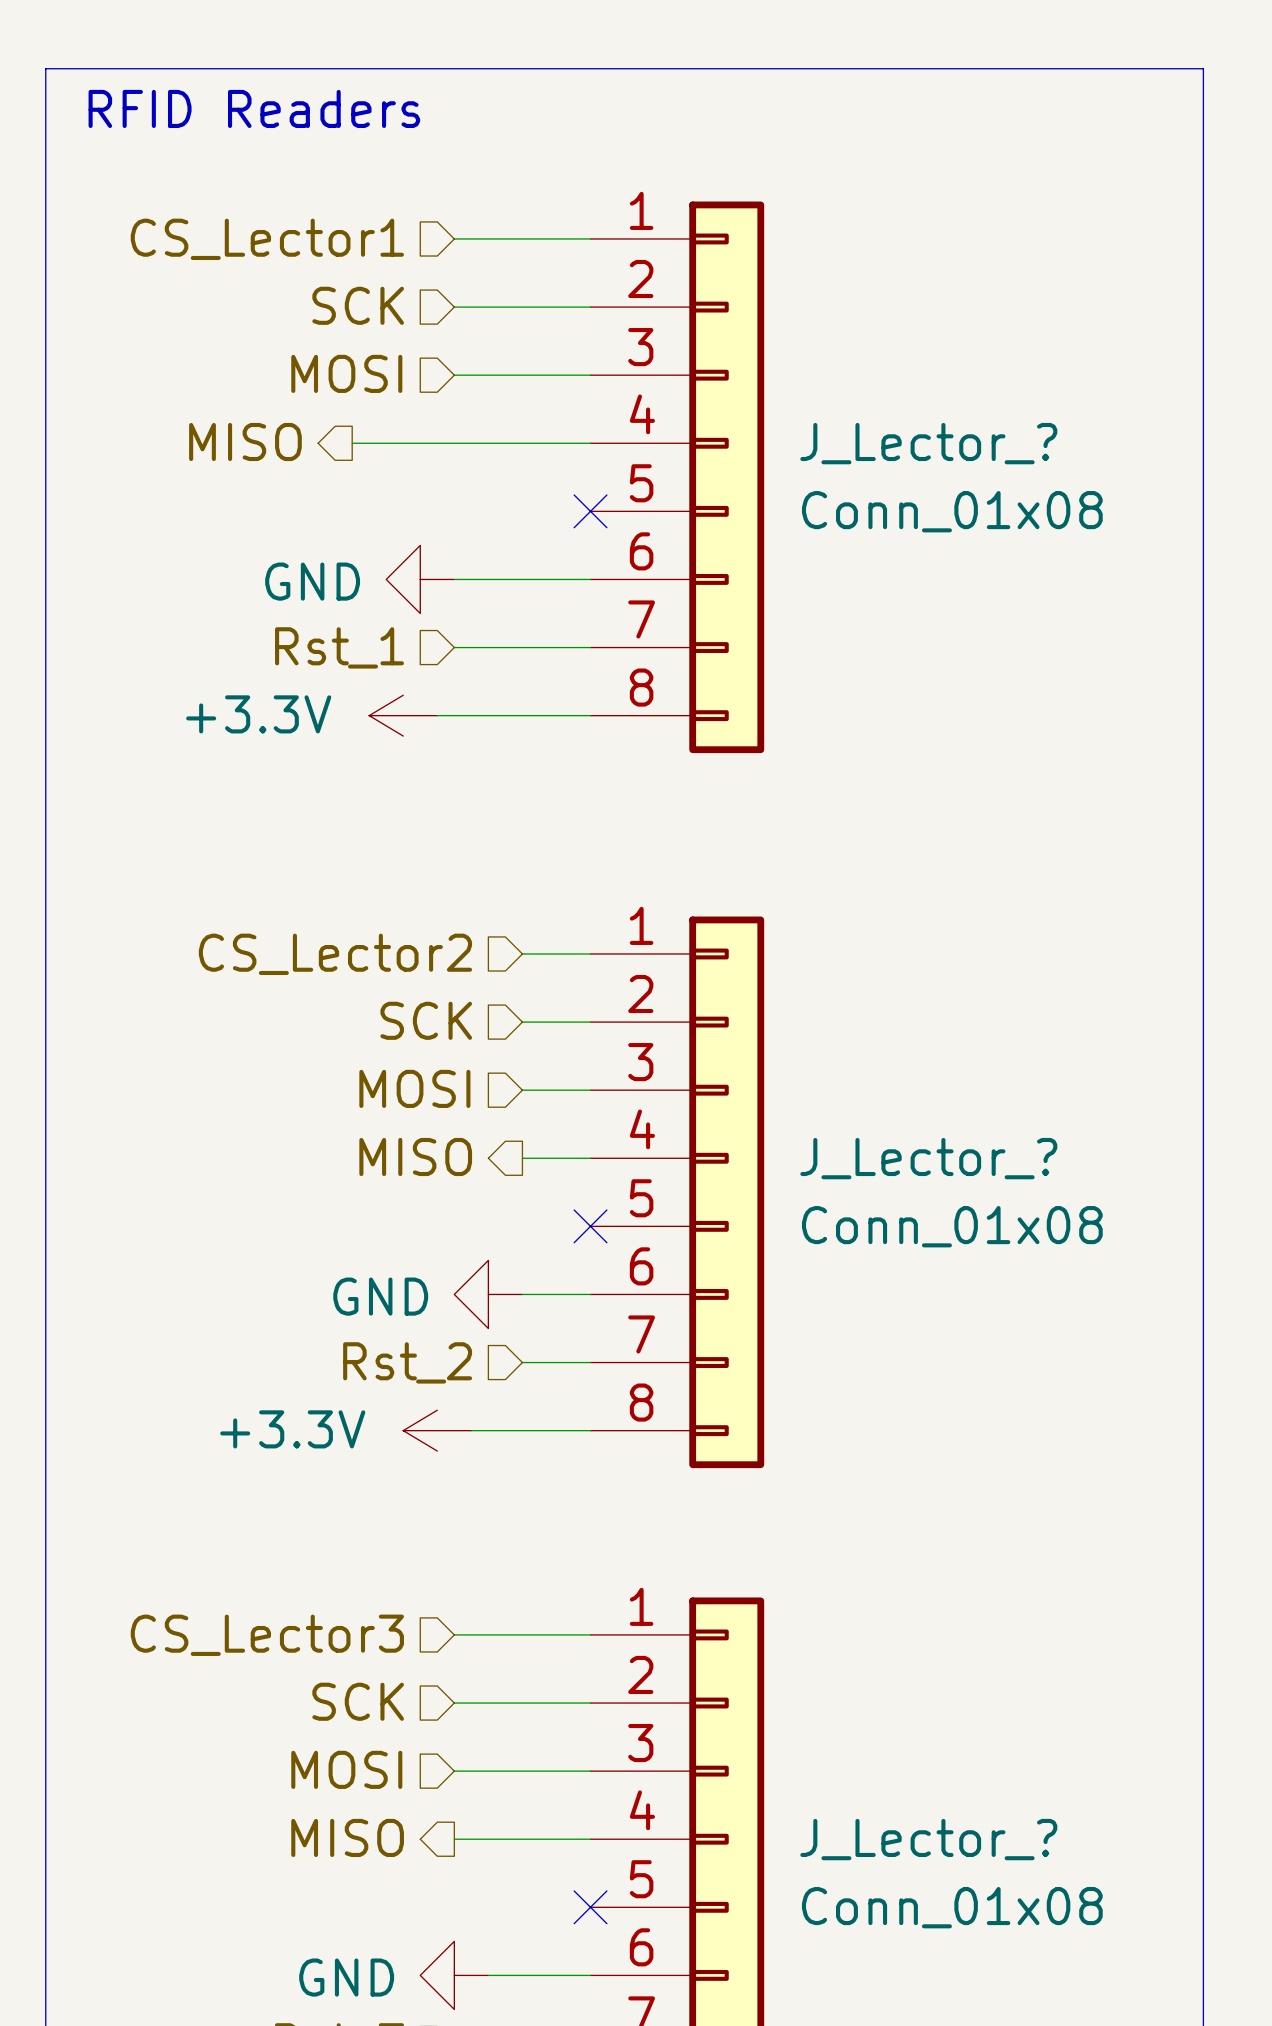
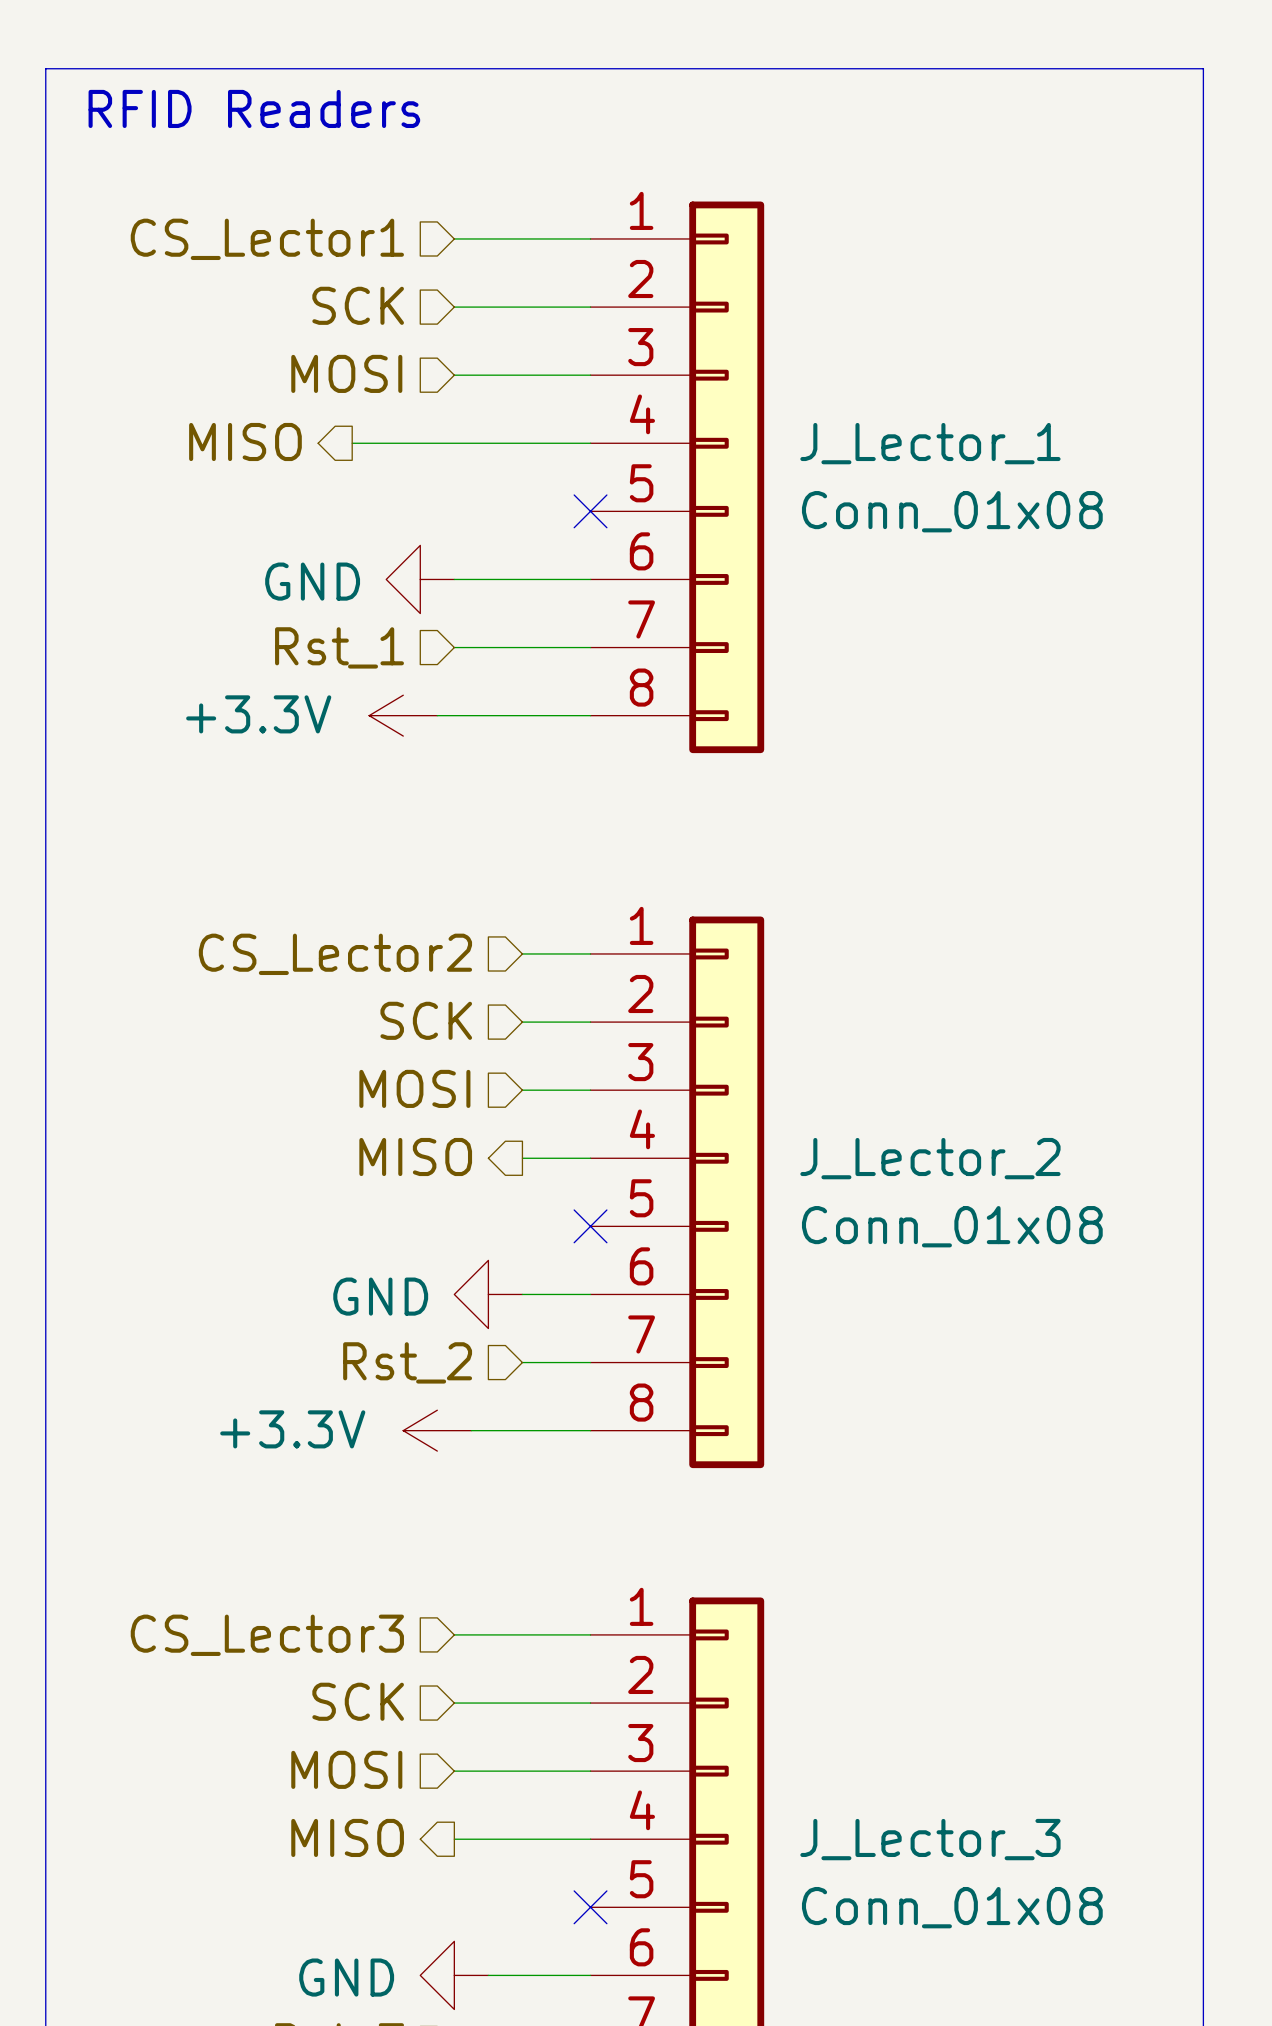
J_Lector_? name: J_Lector_? (928, 443) -> J_Lector_1 (930, 443)
J_Lector_? name: J_Lector_? (928, 1158) -> J_Lector_2 (930, 1158)
J_Lector_? name: J_Lector_? (928, 1839) -> J_Lector_3 (930, 1839)

